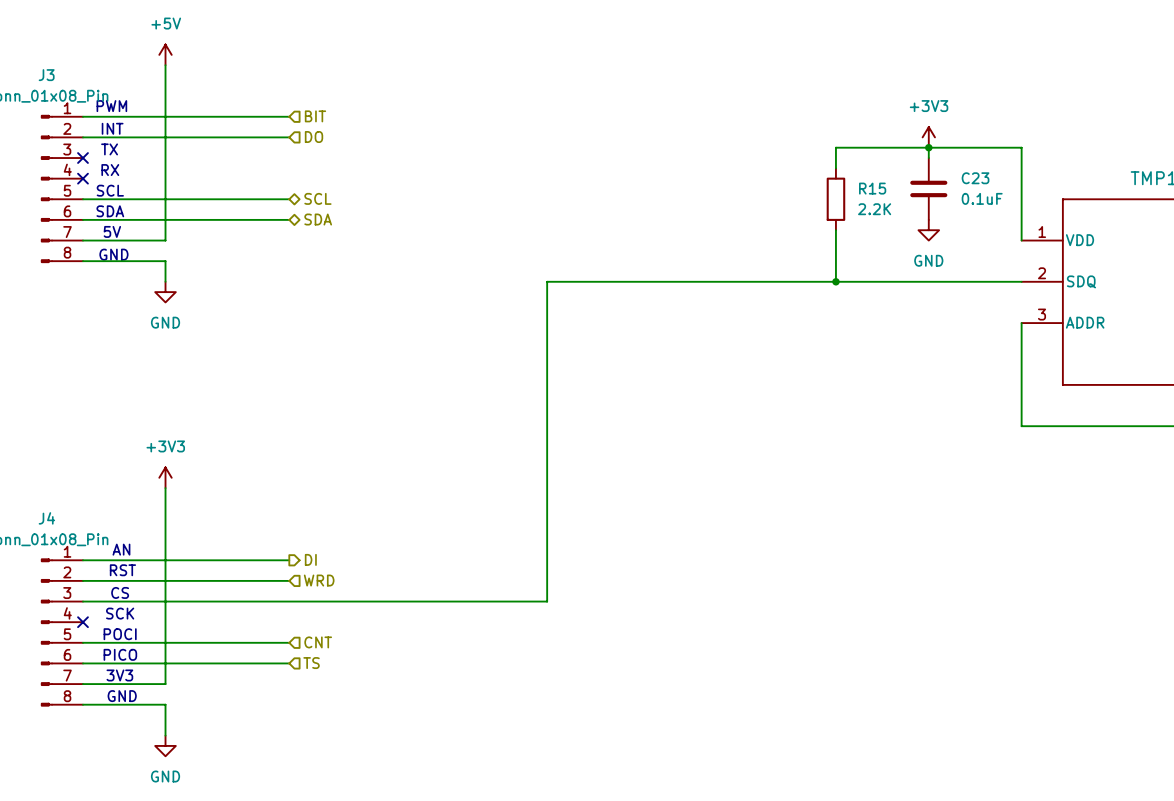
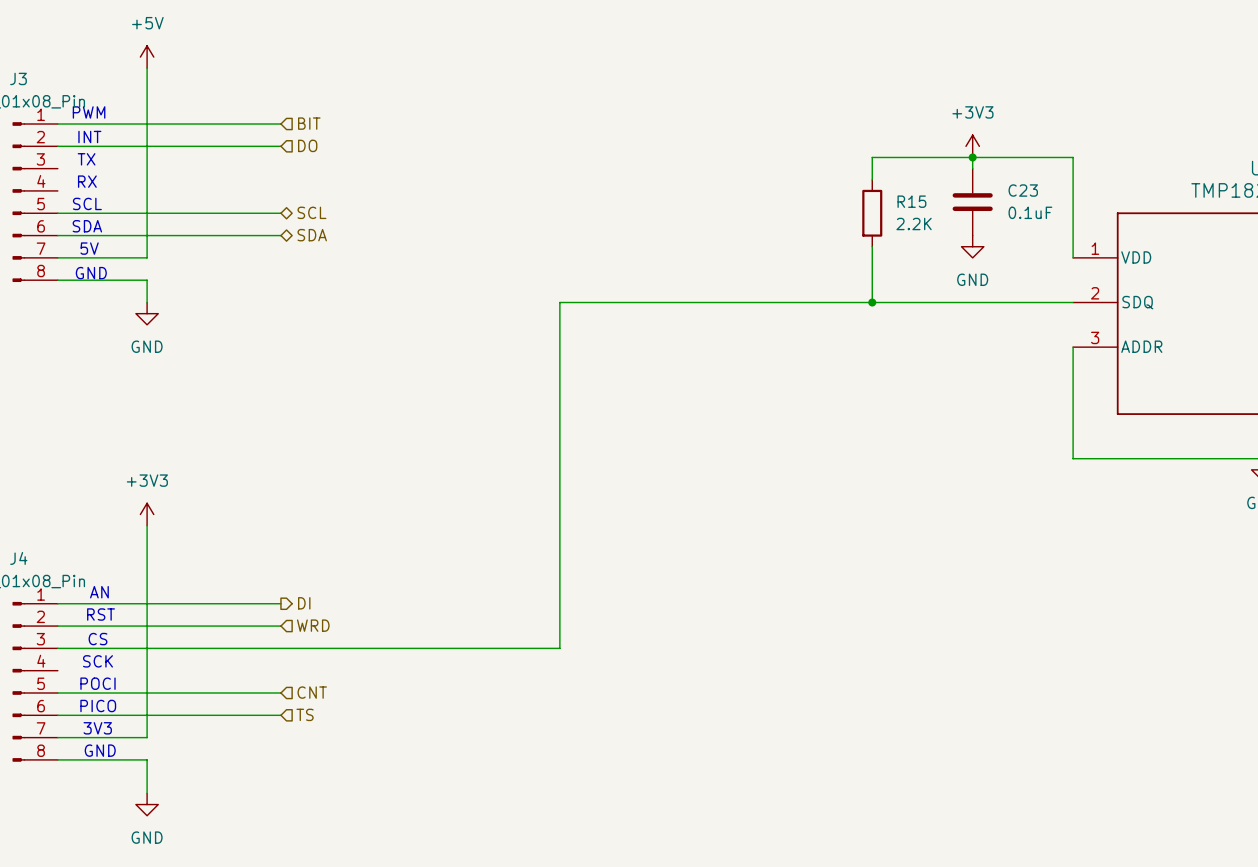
no-connect mark: (82, 158) -> none
no-connect mark: (82, 178) -> none
no-connect mark: (82, 622) -> none

